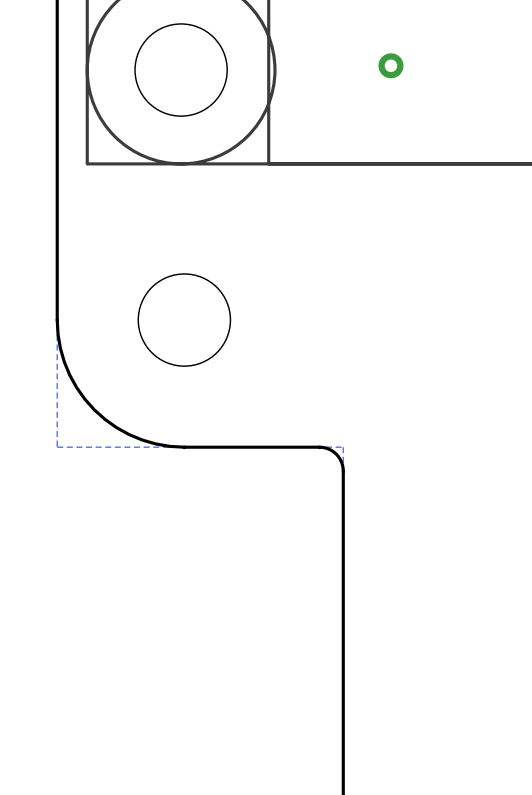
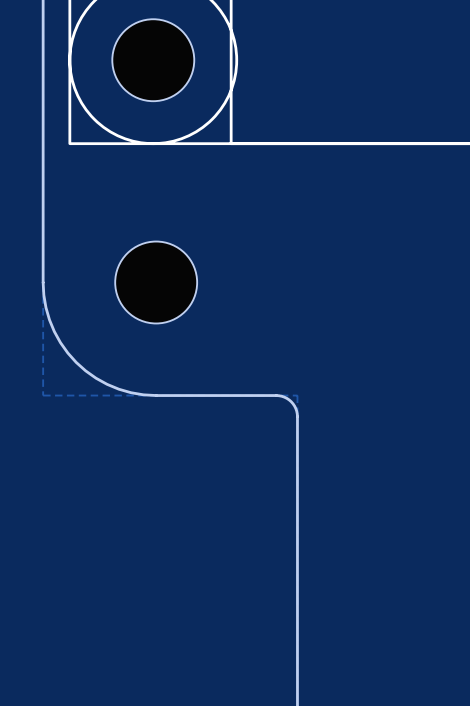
via: (390, 65) -> none

